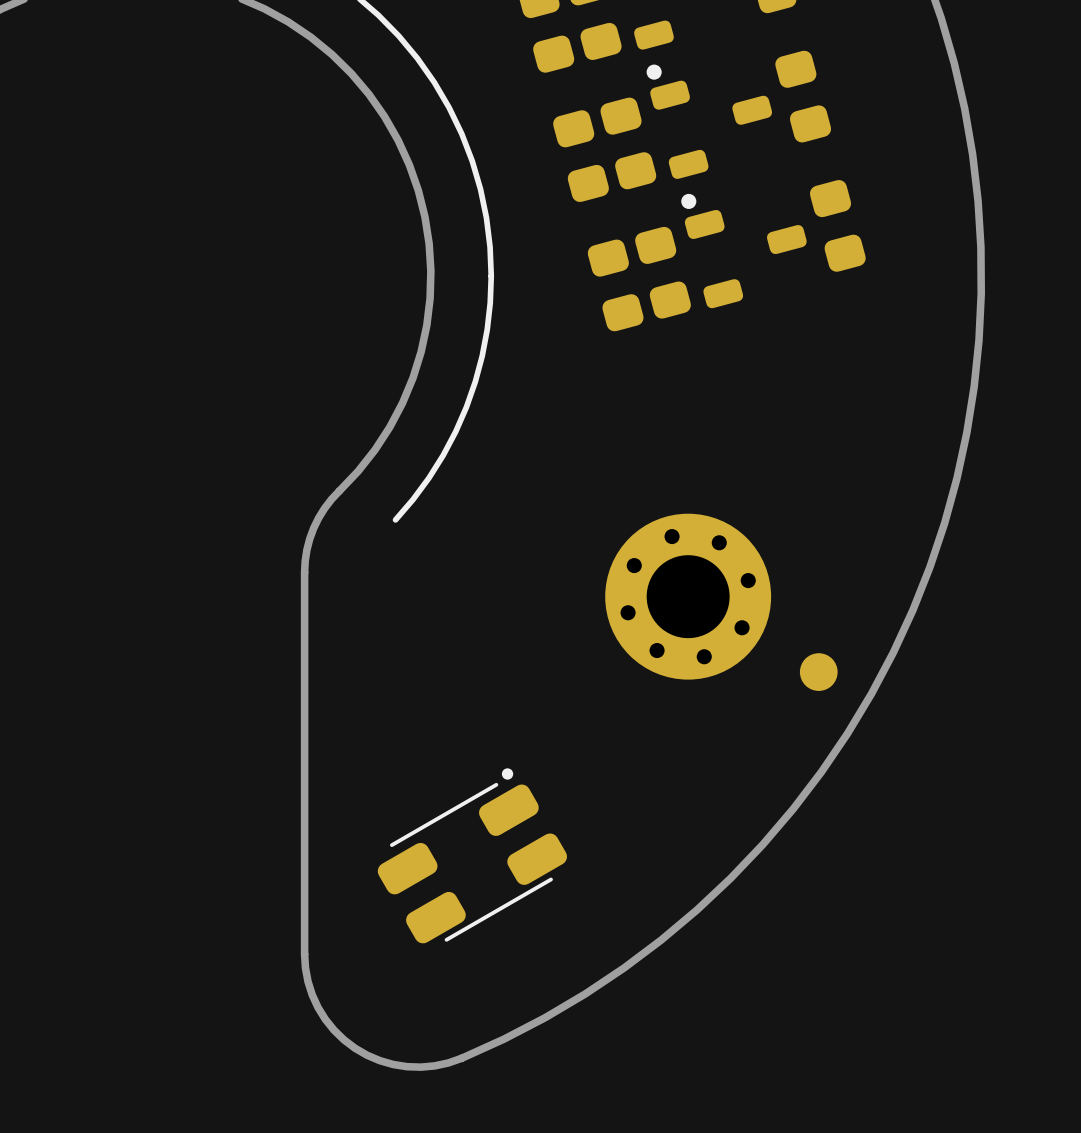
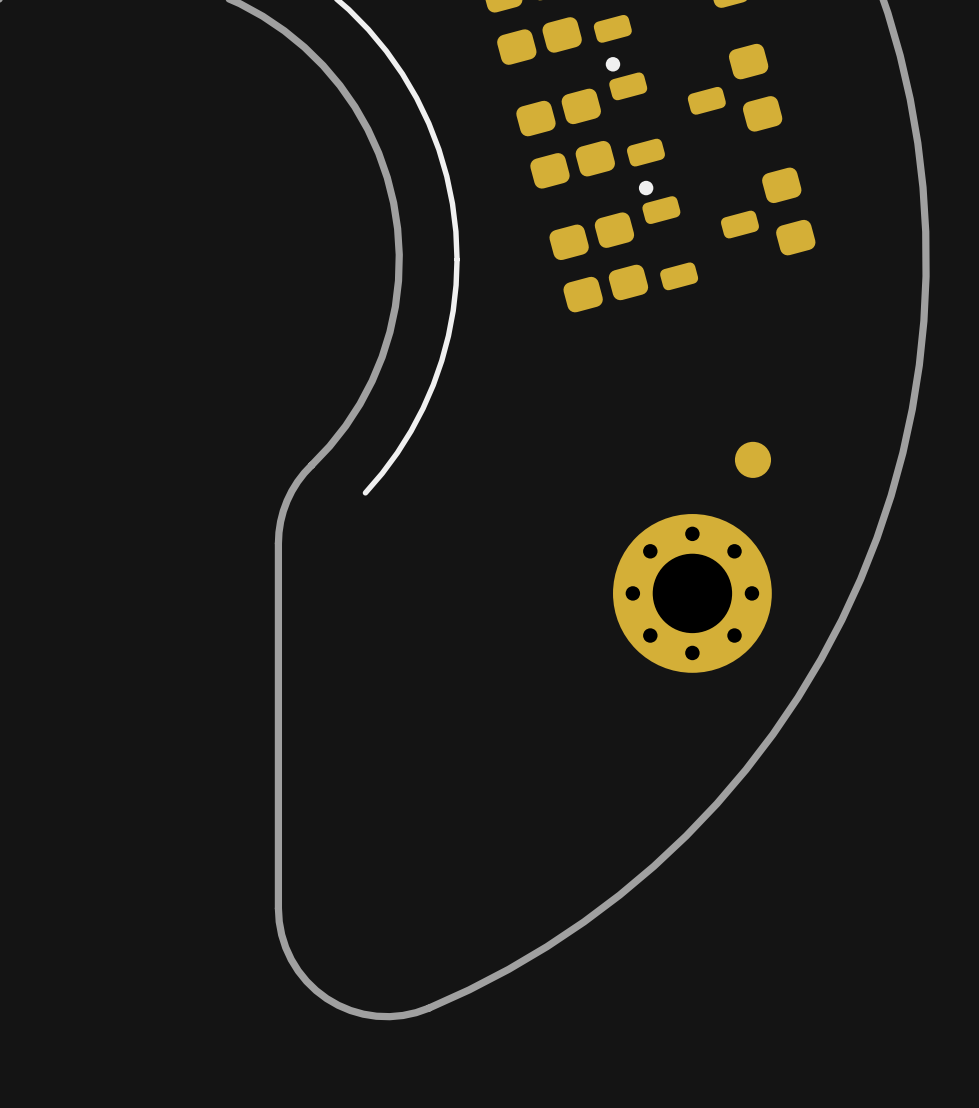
part: (688, 596) -> none
part: none -> (692, 593)
part position: (818, 672) -> (752, 459)
part: (472, 855) -> none

